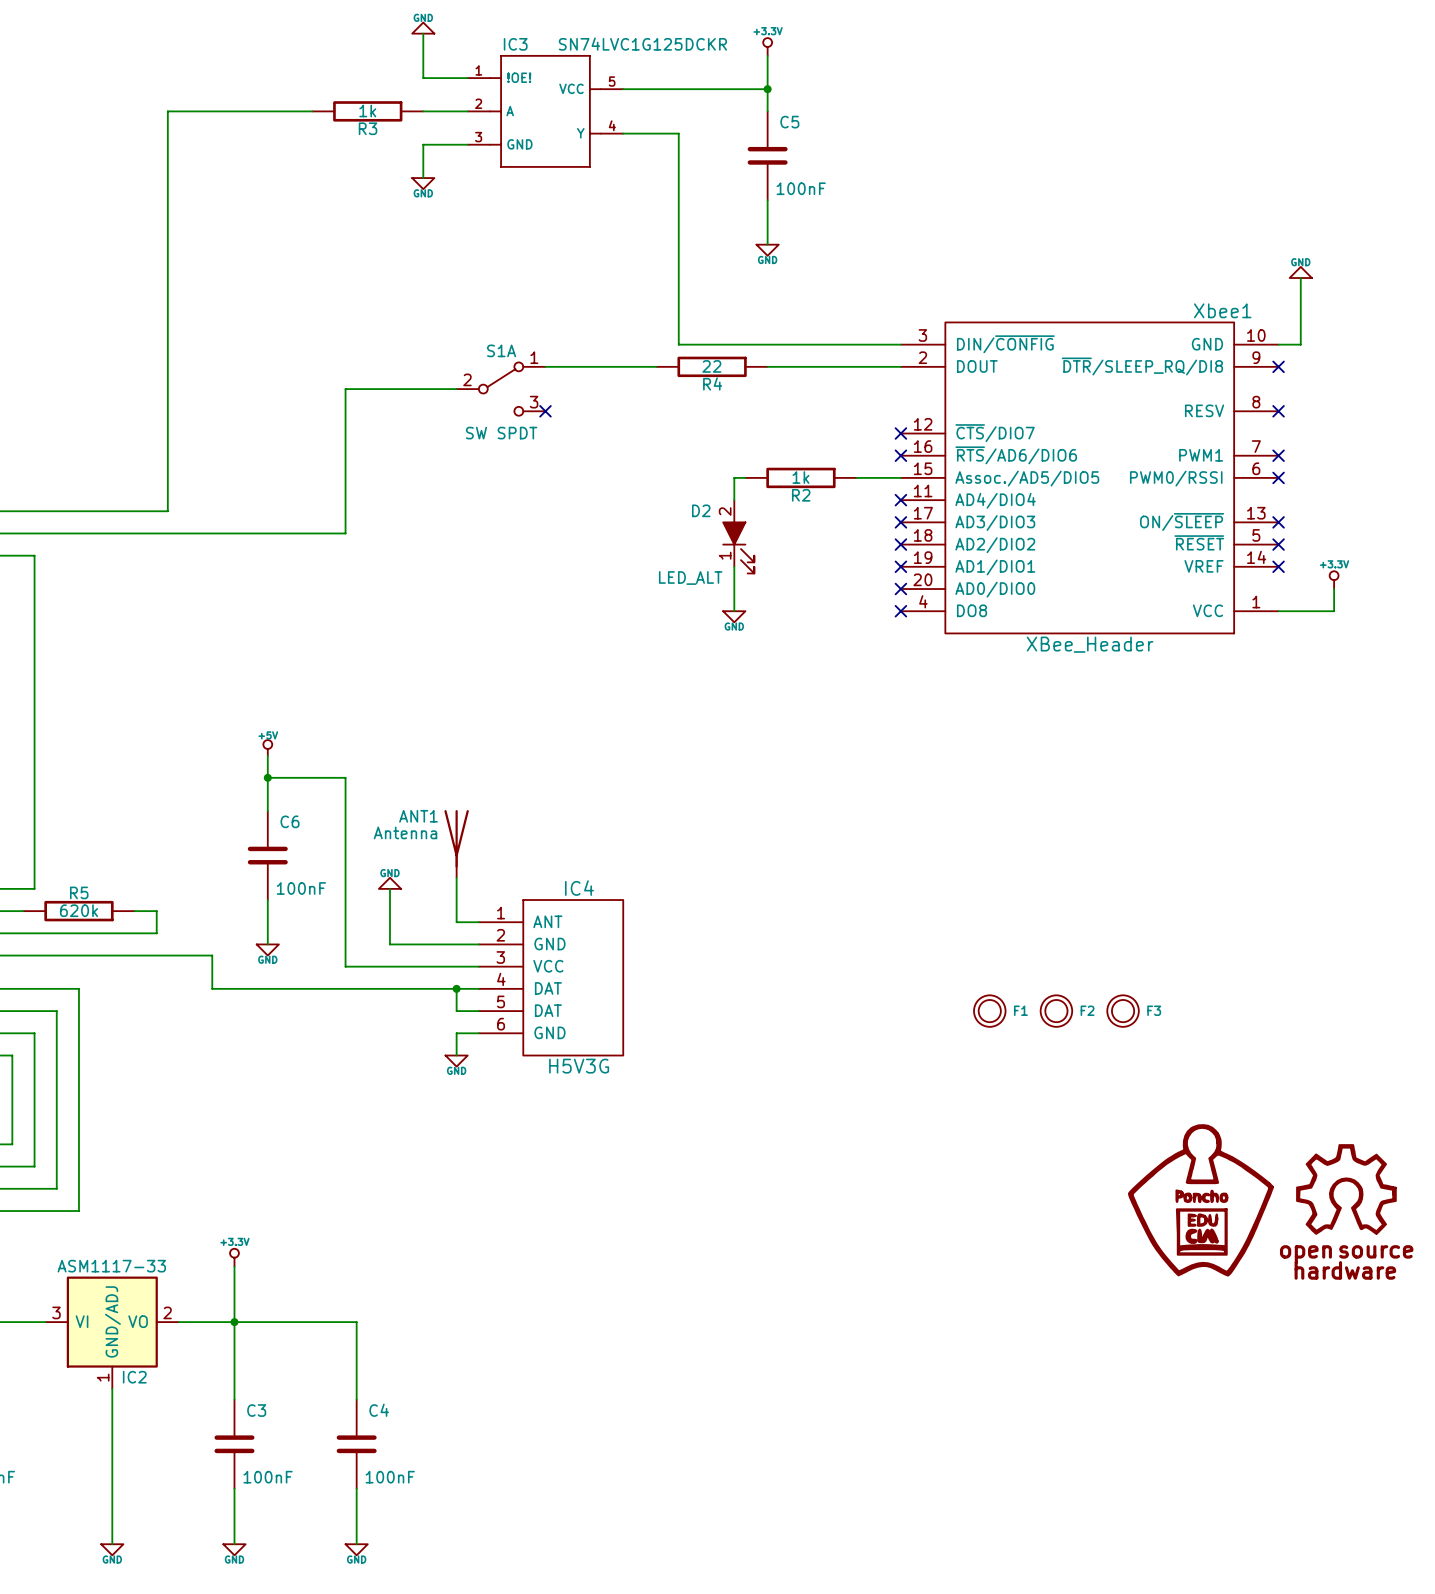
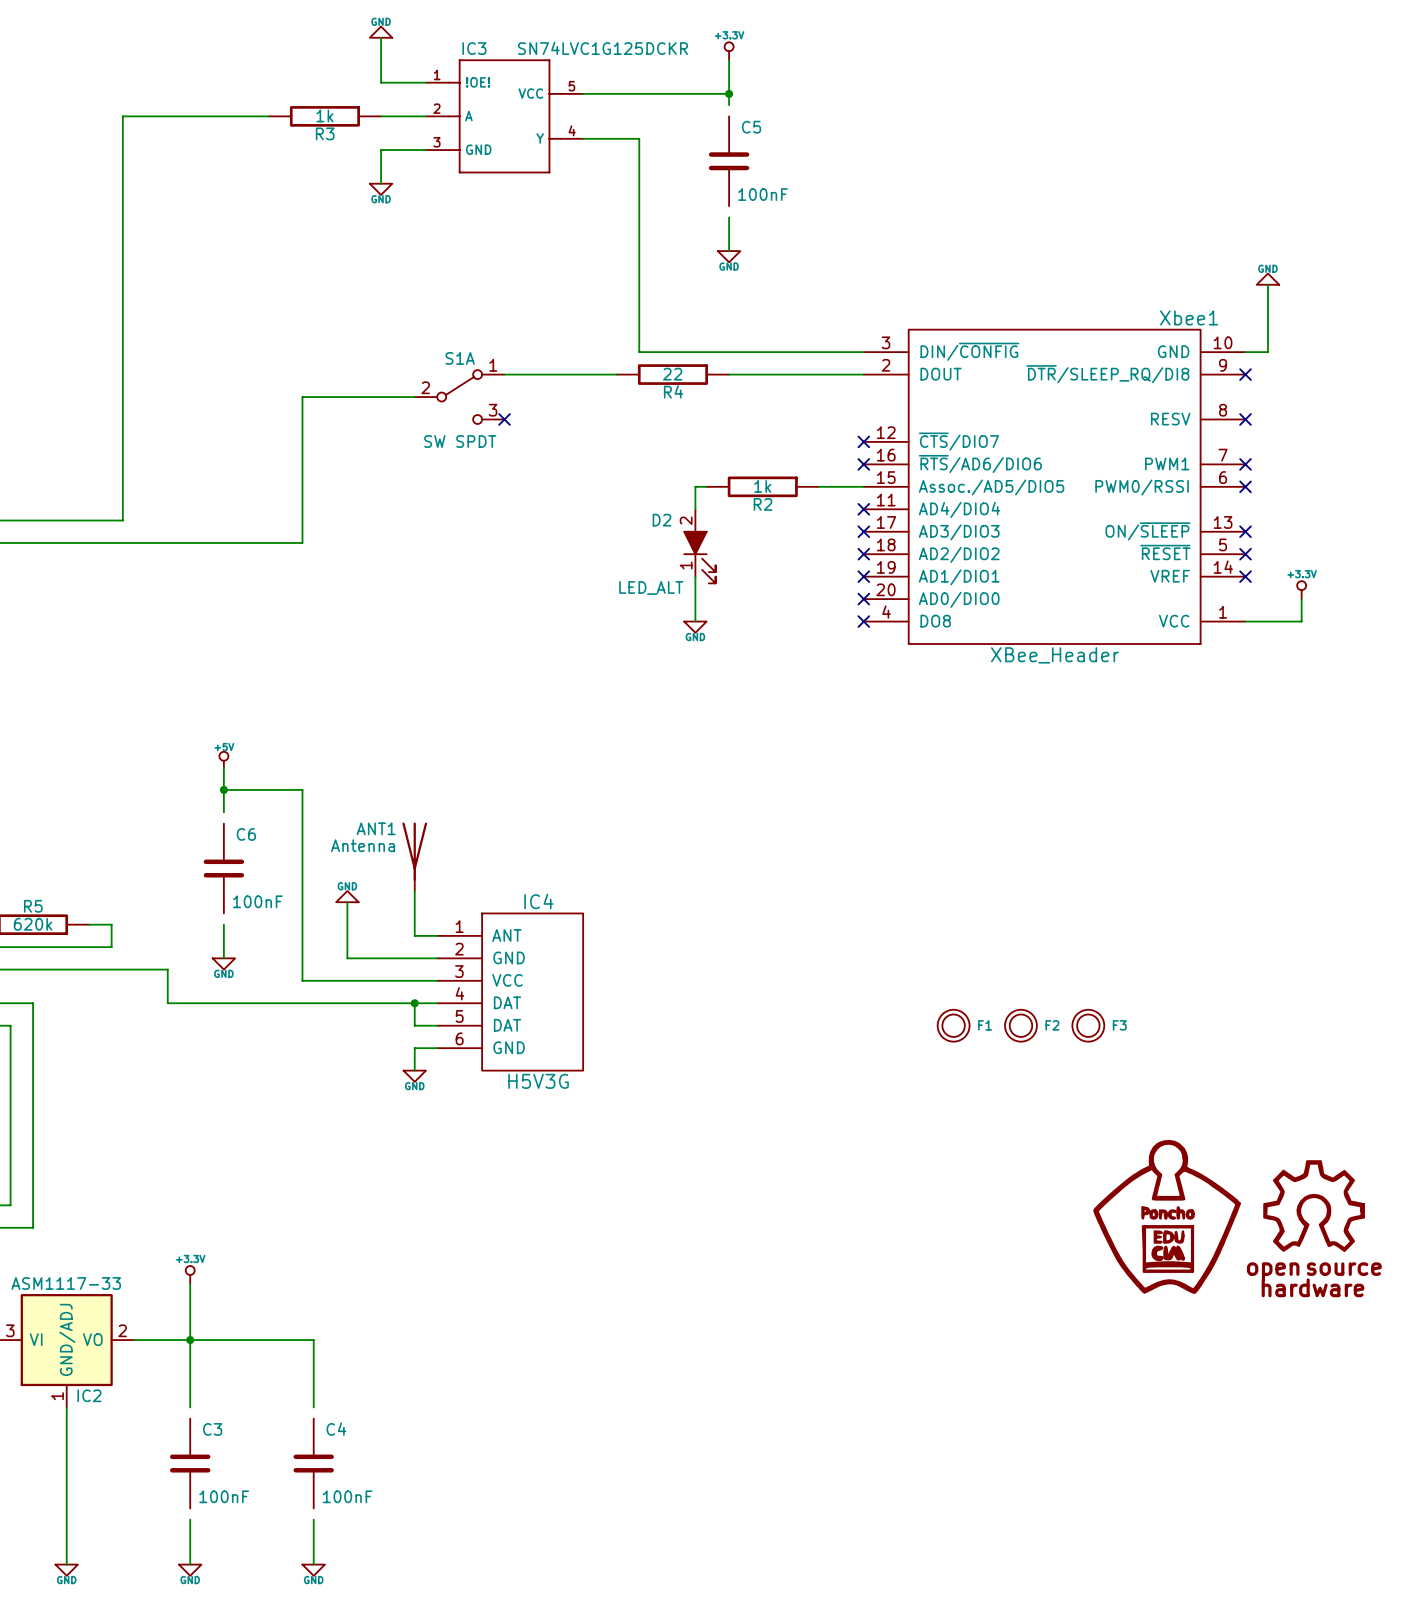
wire: (767, 100) (767, 111) -> none
wire: (767, 200) (767, 211) -> none
wire: (267, 800) (267, 811) -> none
wire: (267, 900) (267, 911) -> none
wire: (234, 1388) (234, 1399) -> none
wire: (356, 1388) (356, 1399) -> none
wire: (234, 1488) (234, 1499) -> none
wire: (356, 1488) (356, 1499) -> none

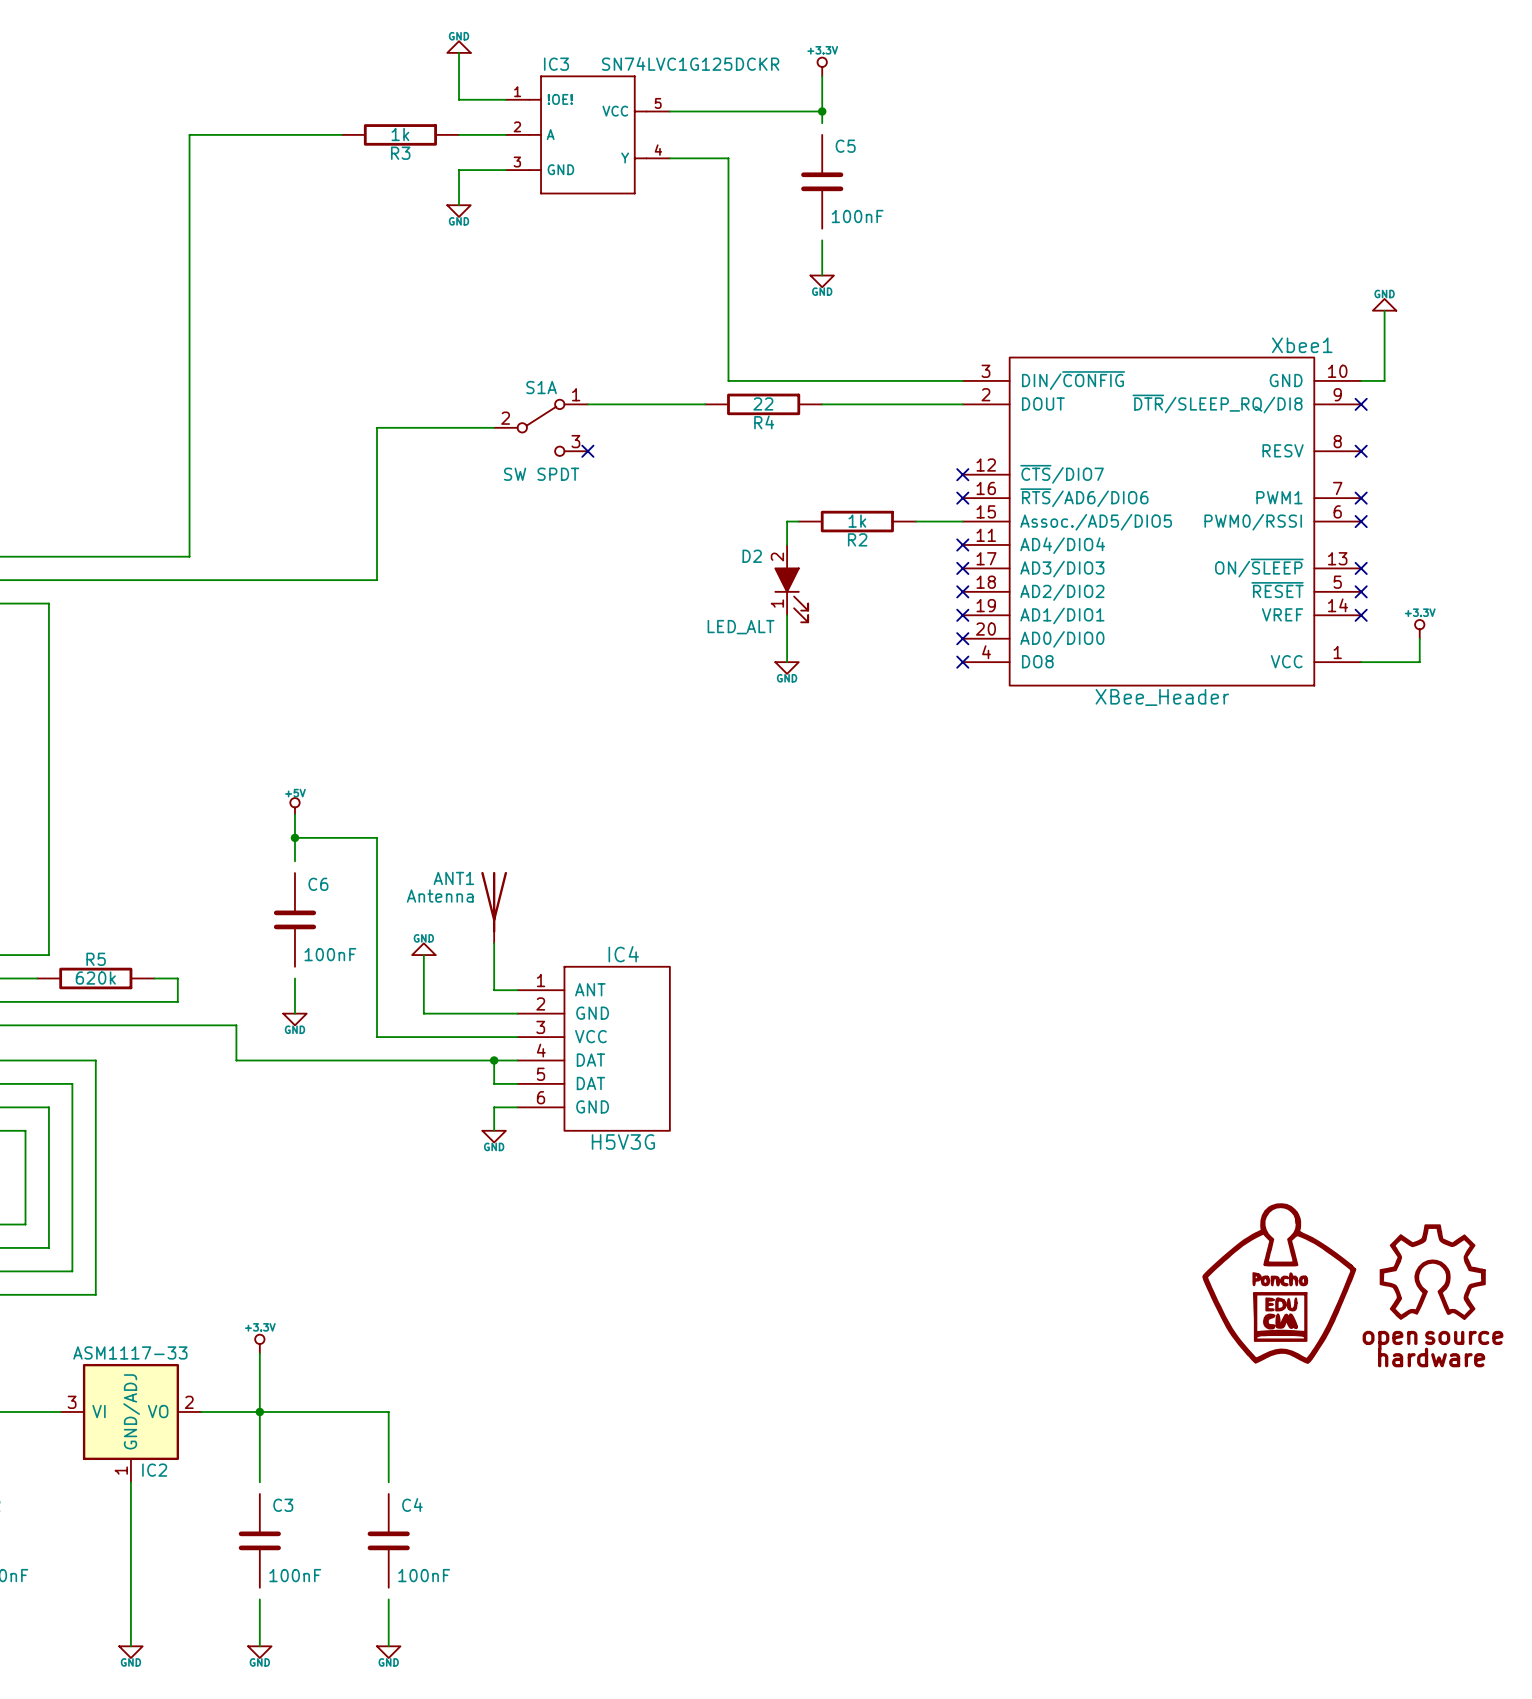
F1: (953, 1025) -> none
F2: (1020, 1025) -> none
F3: (1088, 1025) -> none

